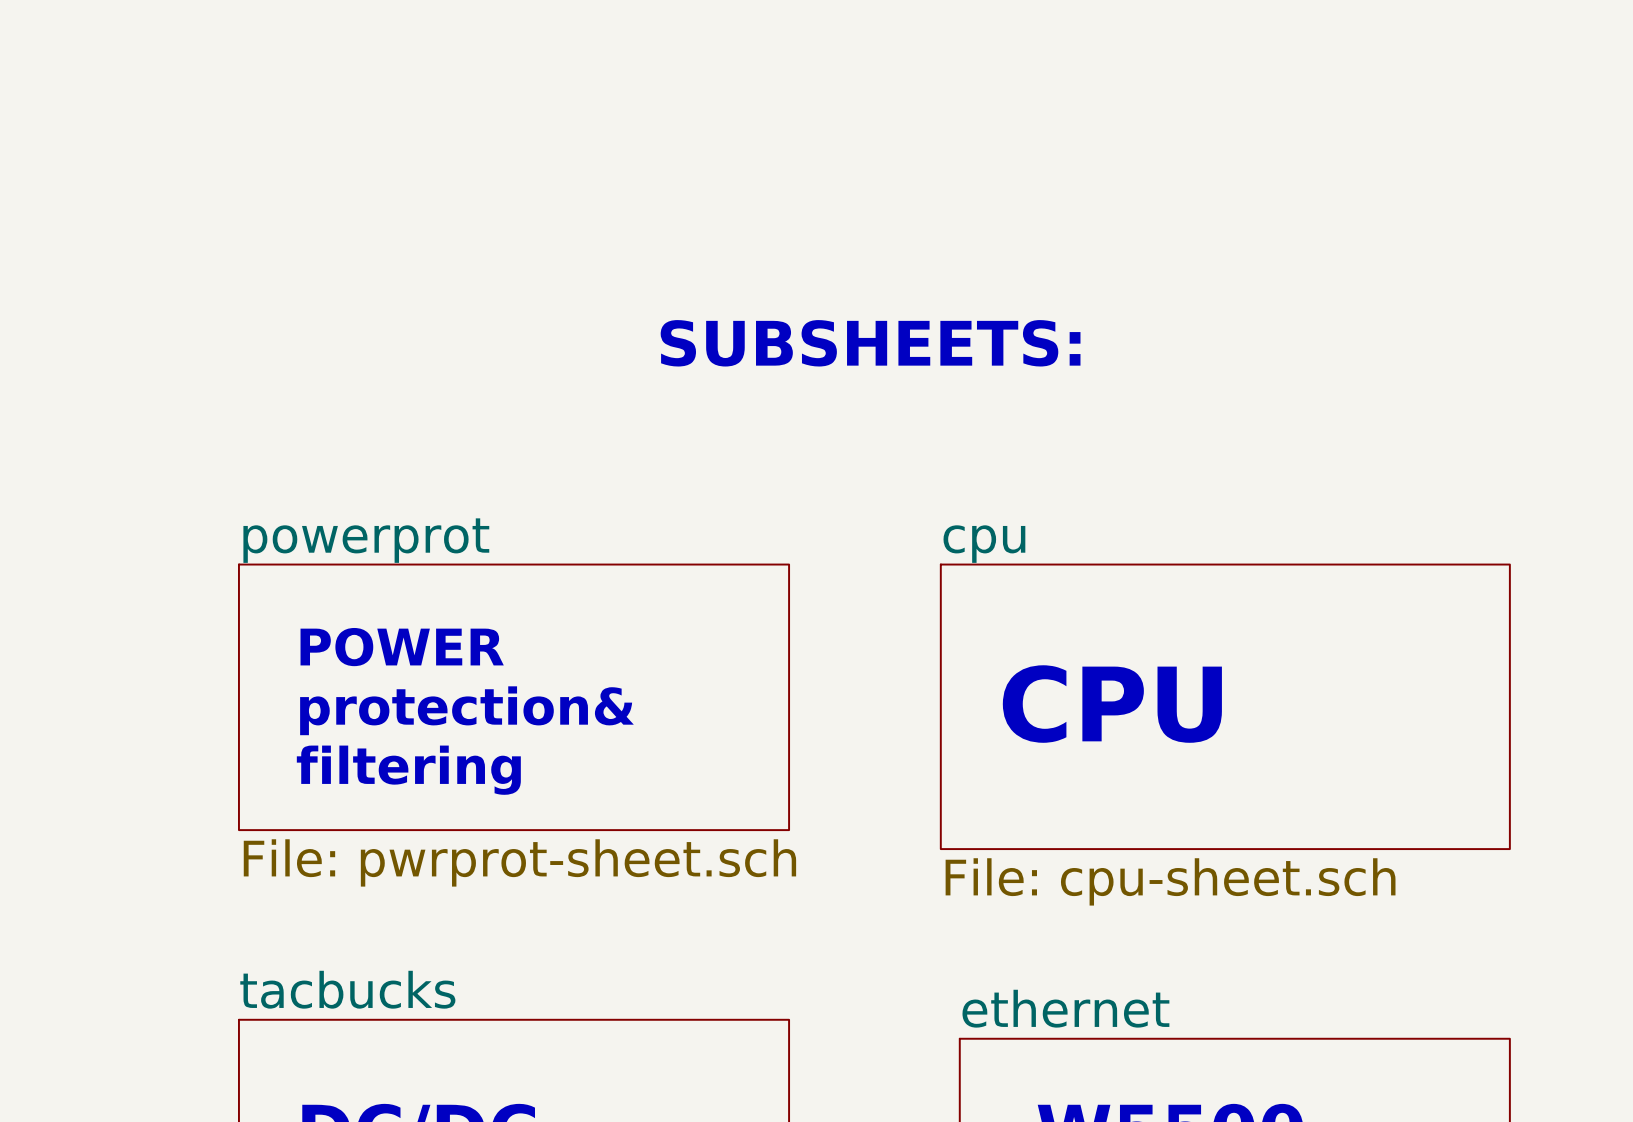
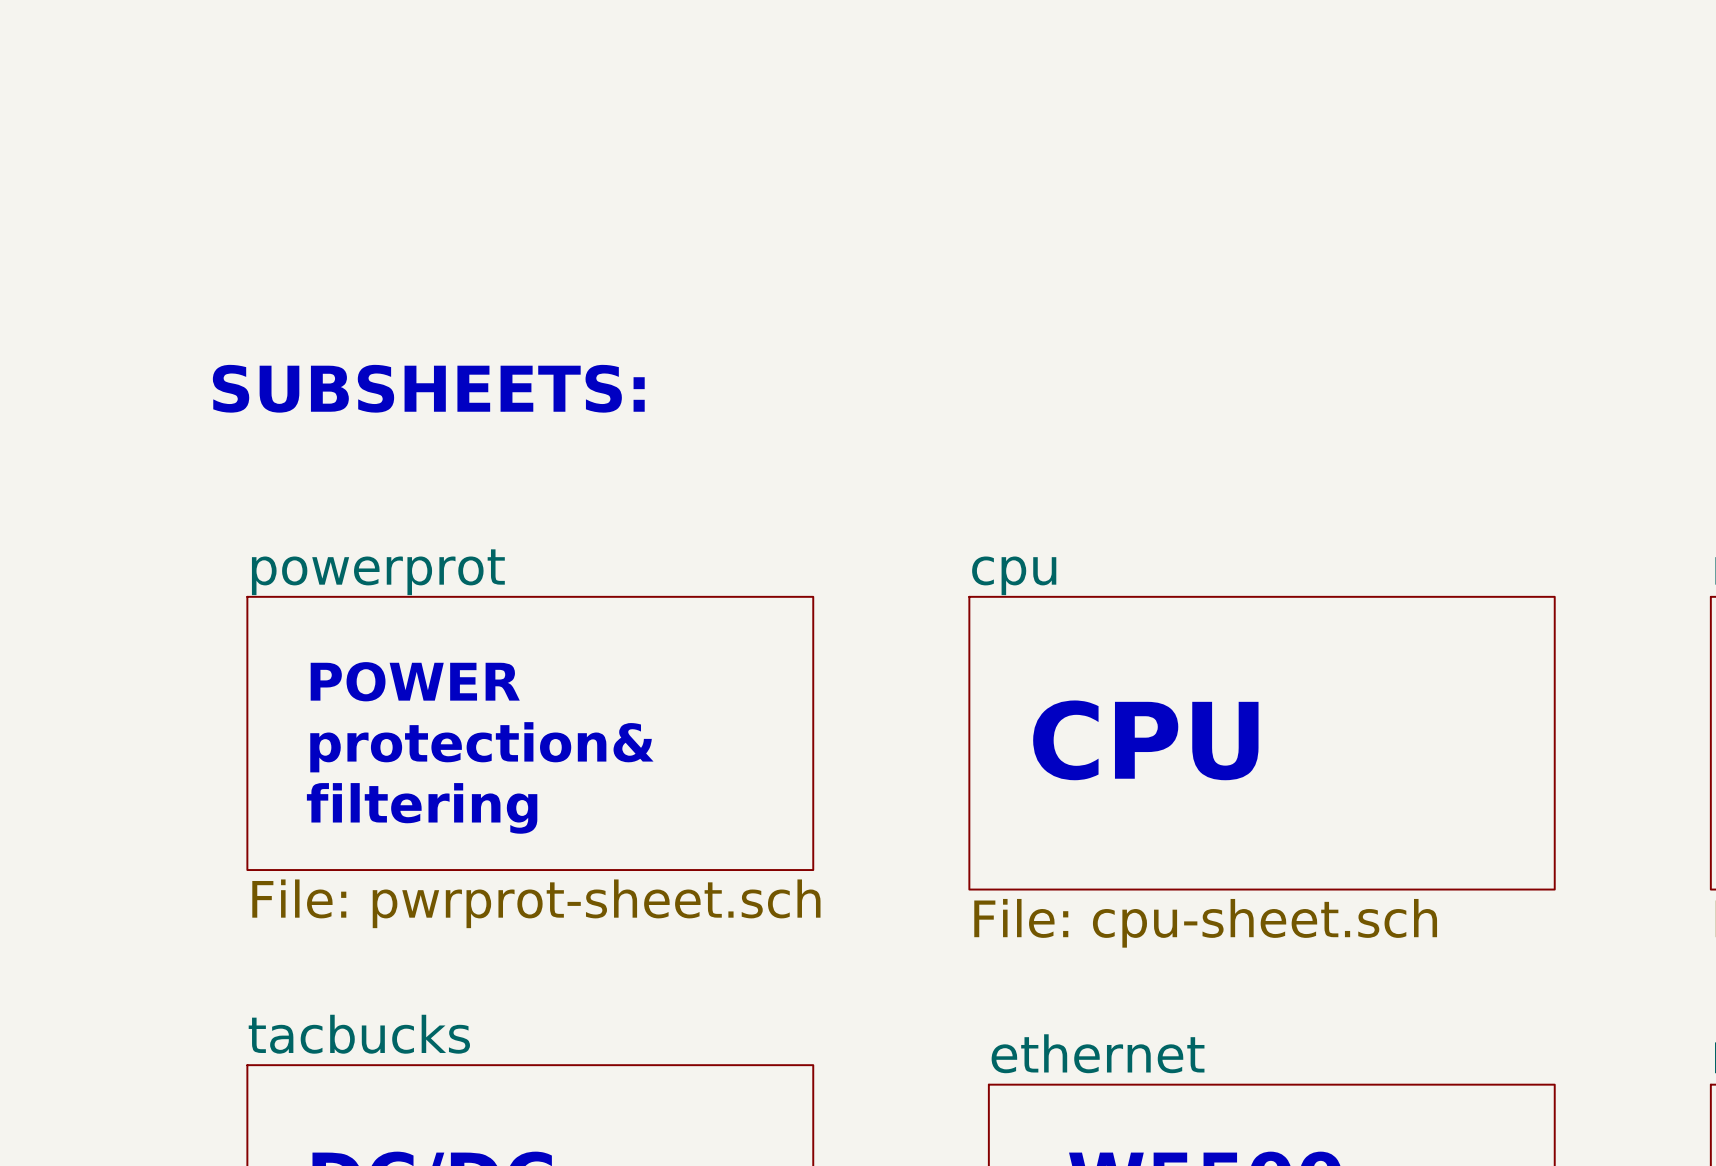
text: SUBSHEETS: (870, 343) -> none
text: none -> SUBSHEETS: (428, 388)

